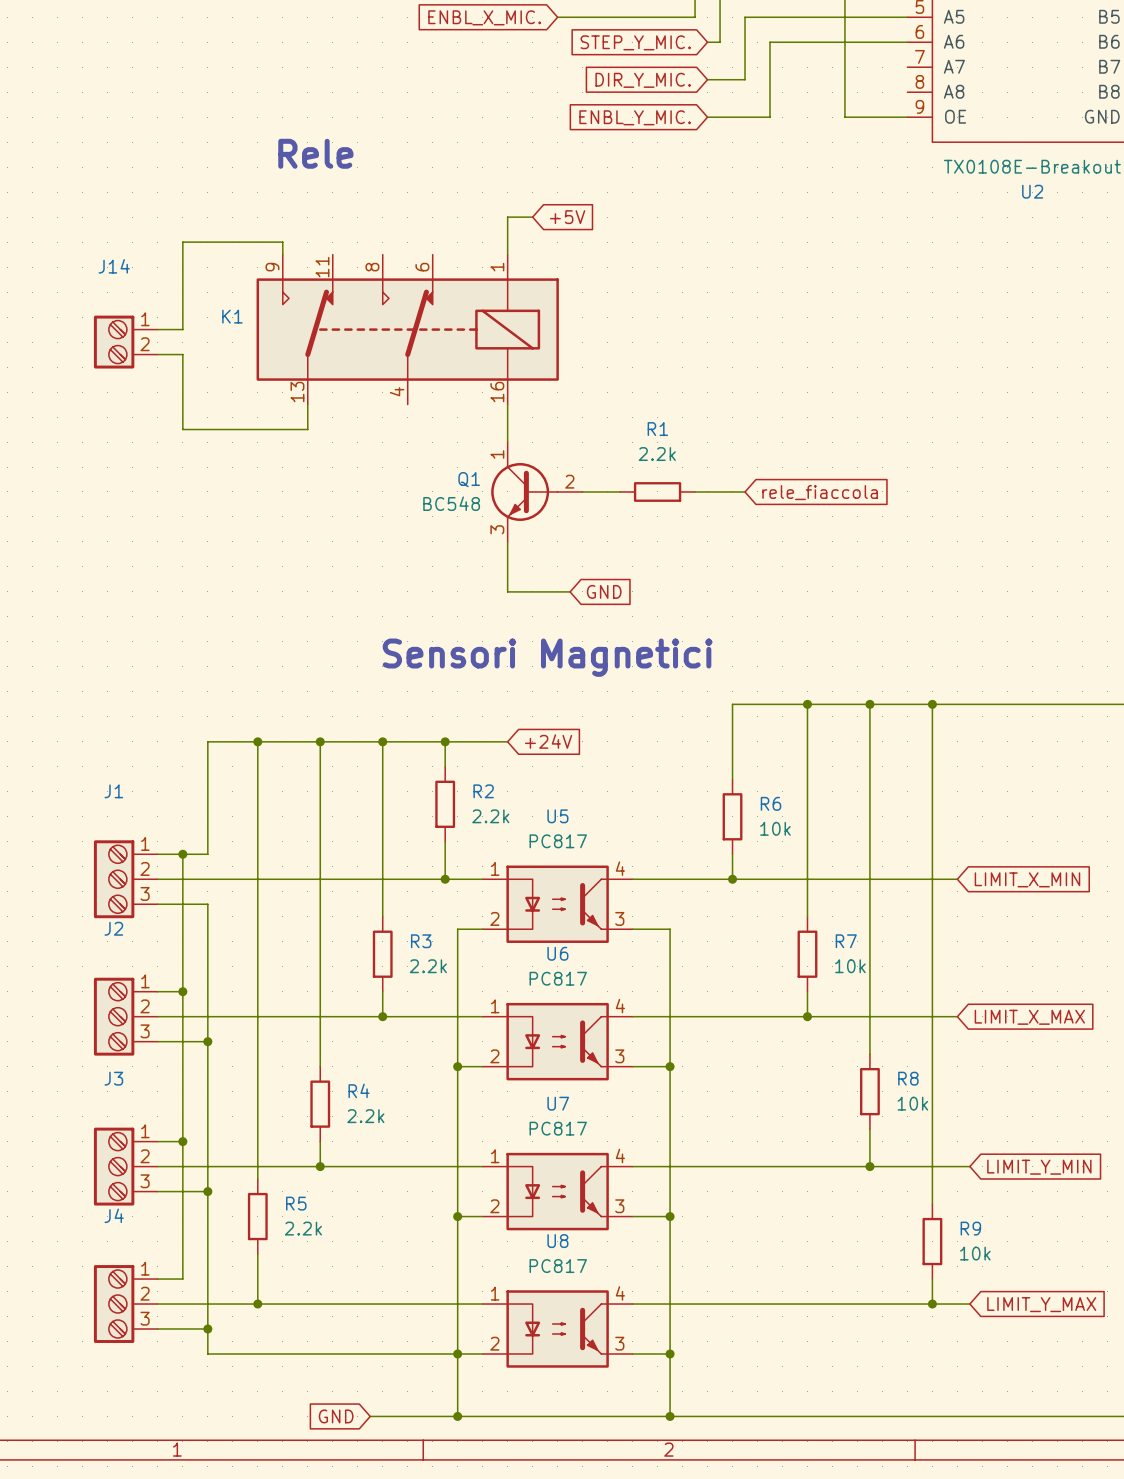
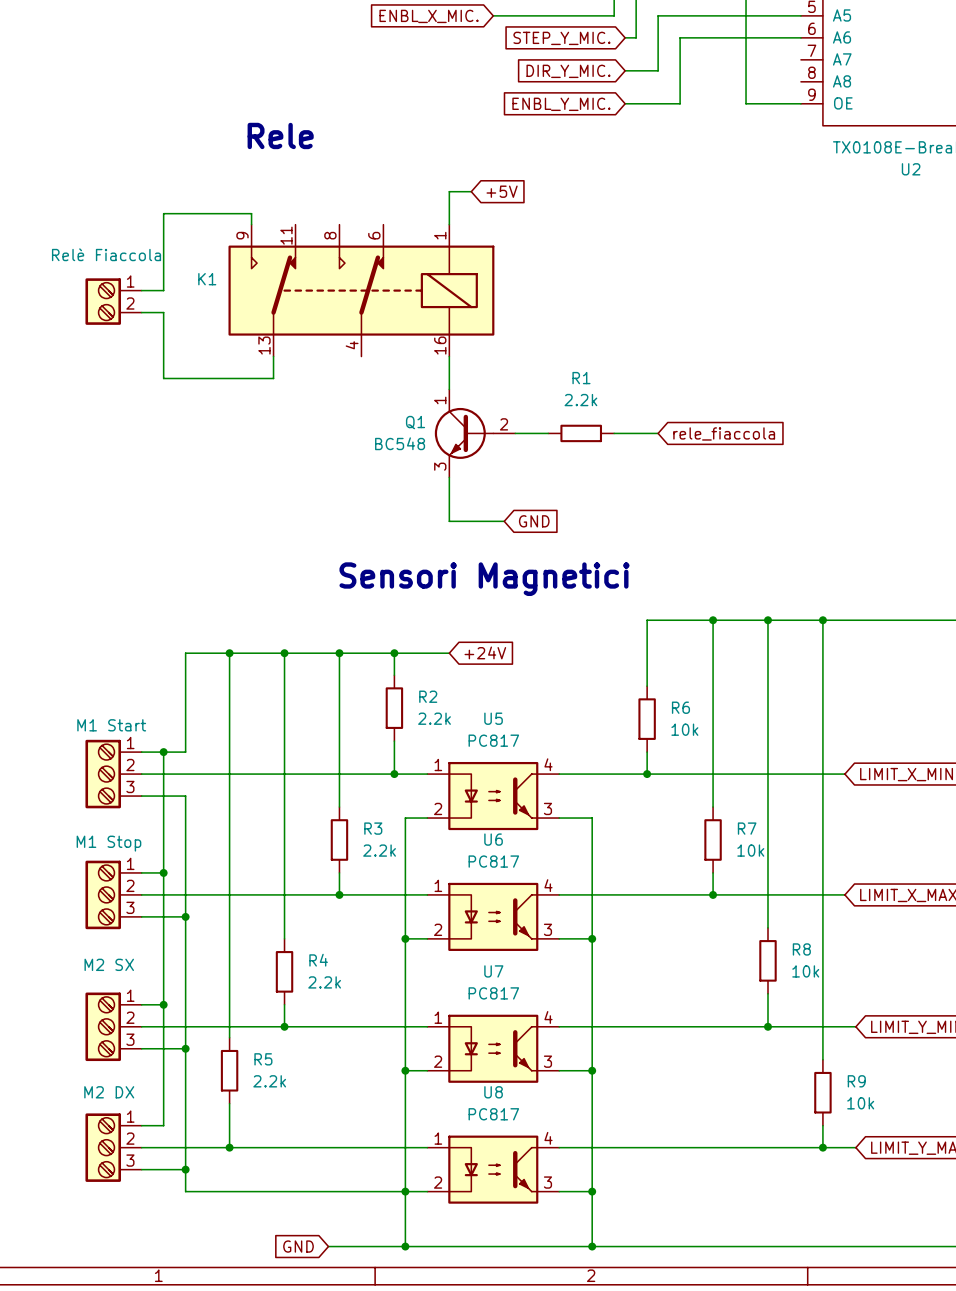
J14 name: J14 (114, 266) -> none
J14 text: none -> Relè Fiaccola (106, 254)
J1 name: J1 (113, 791) -> none
J1 text: none -> M1 Start (111, 725)
J2 name: J2 (113, 928) -> none
J2 text: none -> M1 Stop (108, 843)
J3 name: J3 (113, 1078) -> none
J3 text: none -> M2 SX (109, 964)
J4 name: J4 (114, 1215) -> none
J4 text: none -> M2 DX (109, 1092)

